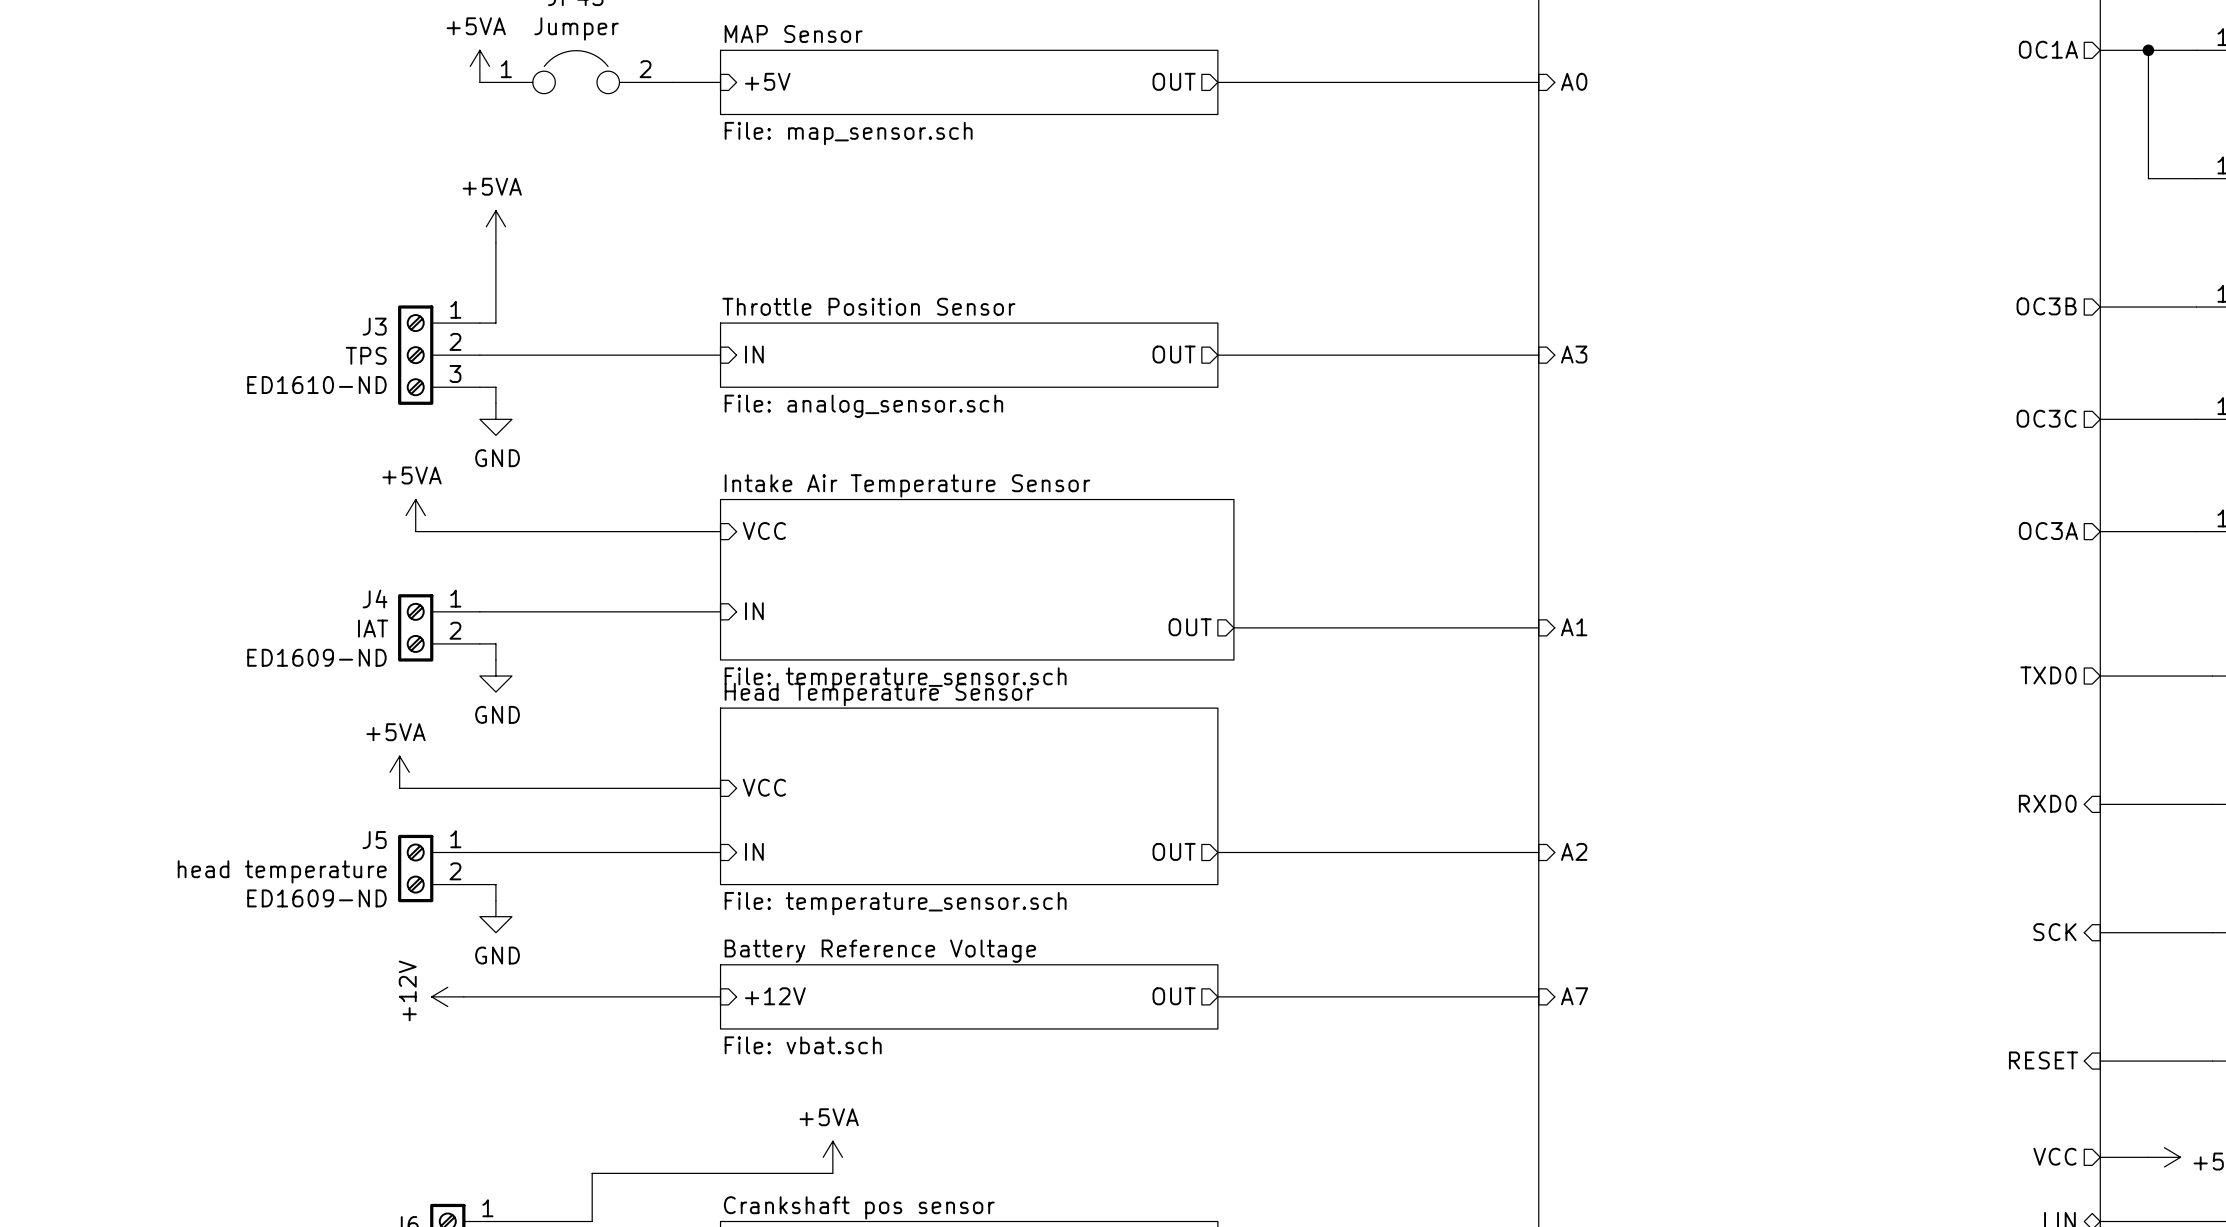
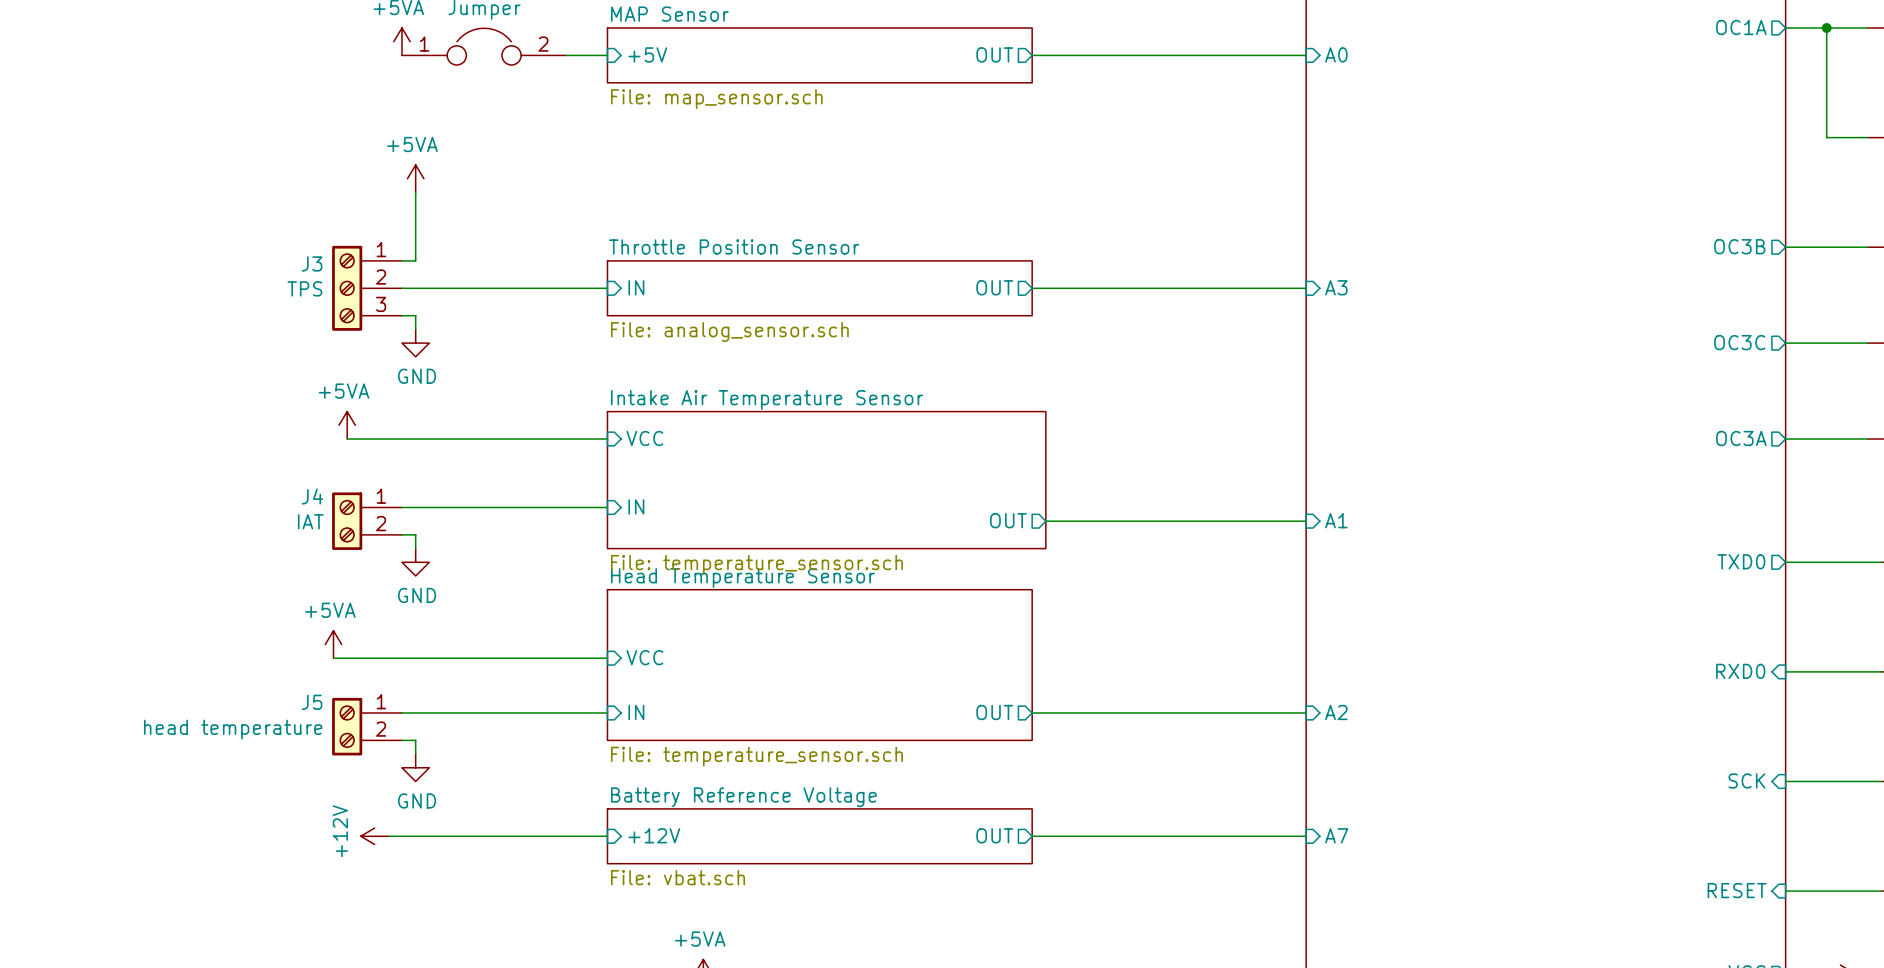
J3 text: ED1610-ND (316, 385) -> none
J4 text: ED1609-ND (316, 657) -> none
J5 text: ED1609-ND (316, 898) -> none

